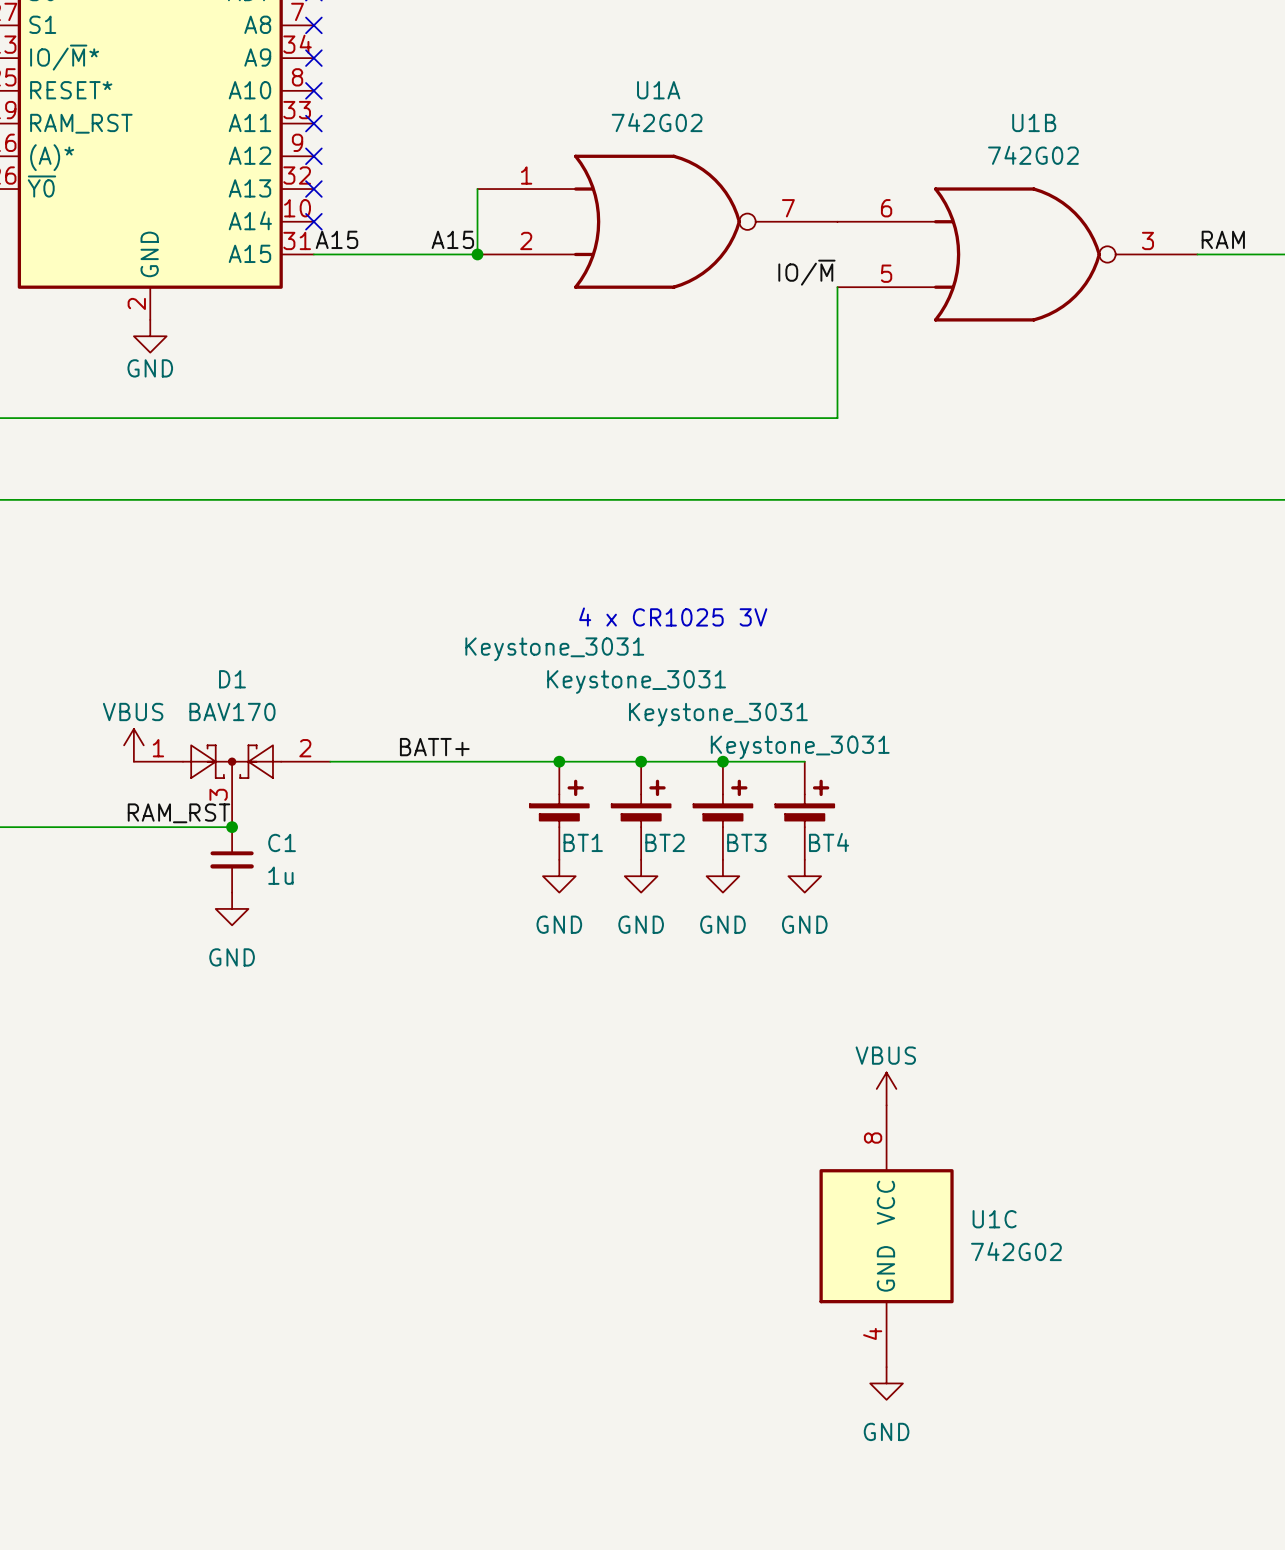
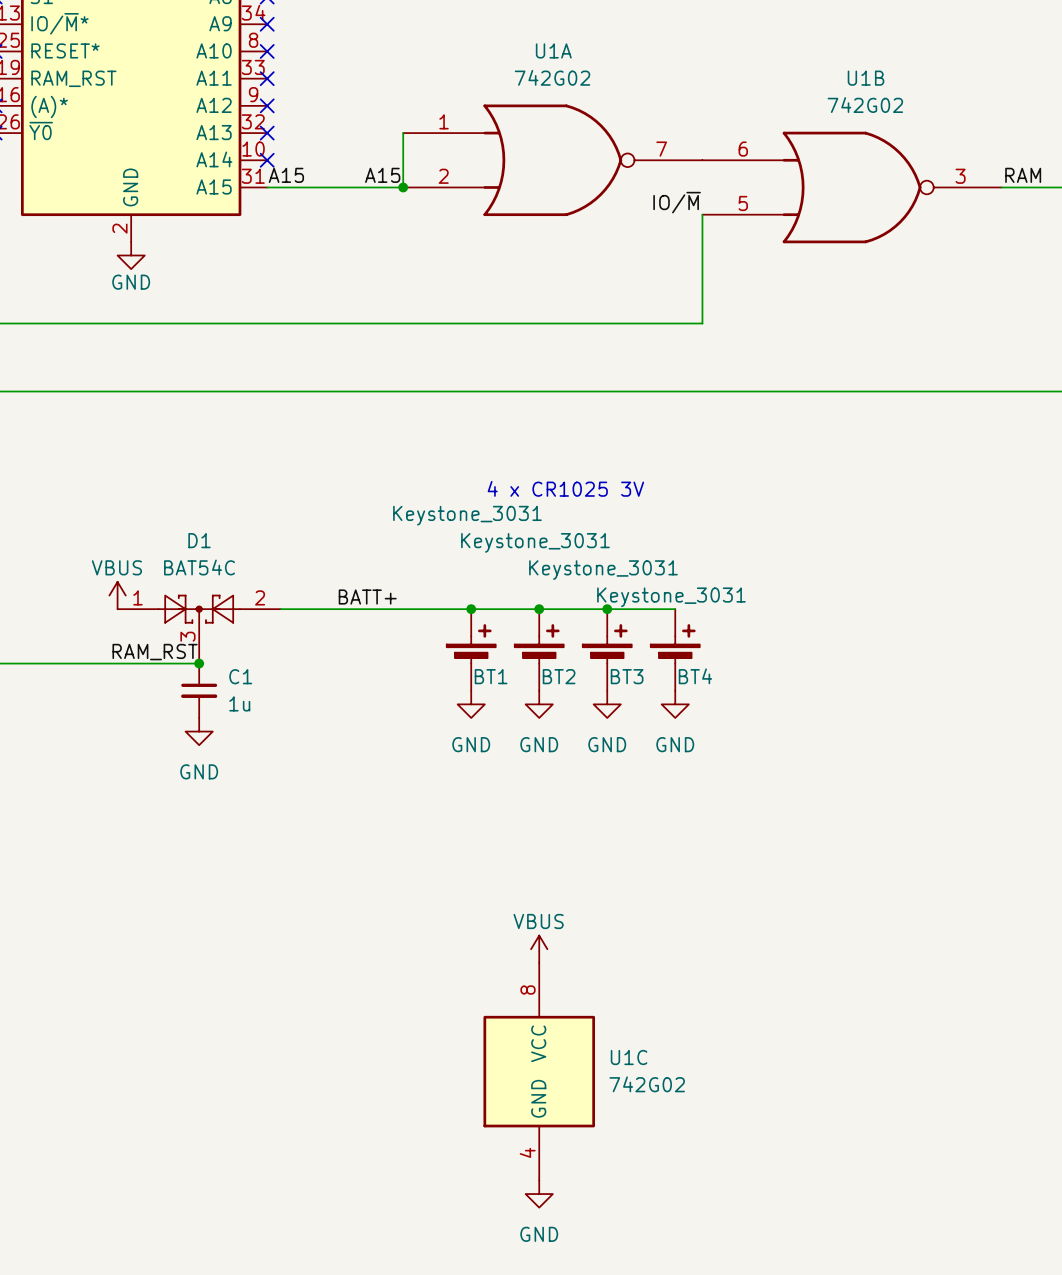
D1 value: BAV170 (232, 711) -> BAT54C (199, 567)
power symbol position: VBUS (886, 1088) -> VBUS (539, 949)
U1C position: (886, 1236) -> (539, 1071)
power symbol position: GND (886, 1383) -> GND (539, 1194)

